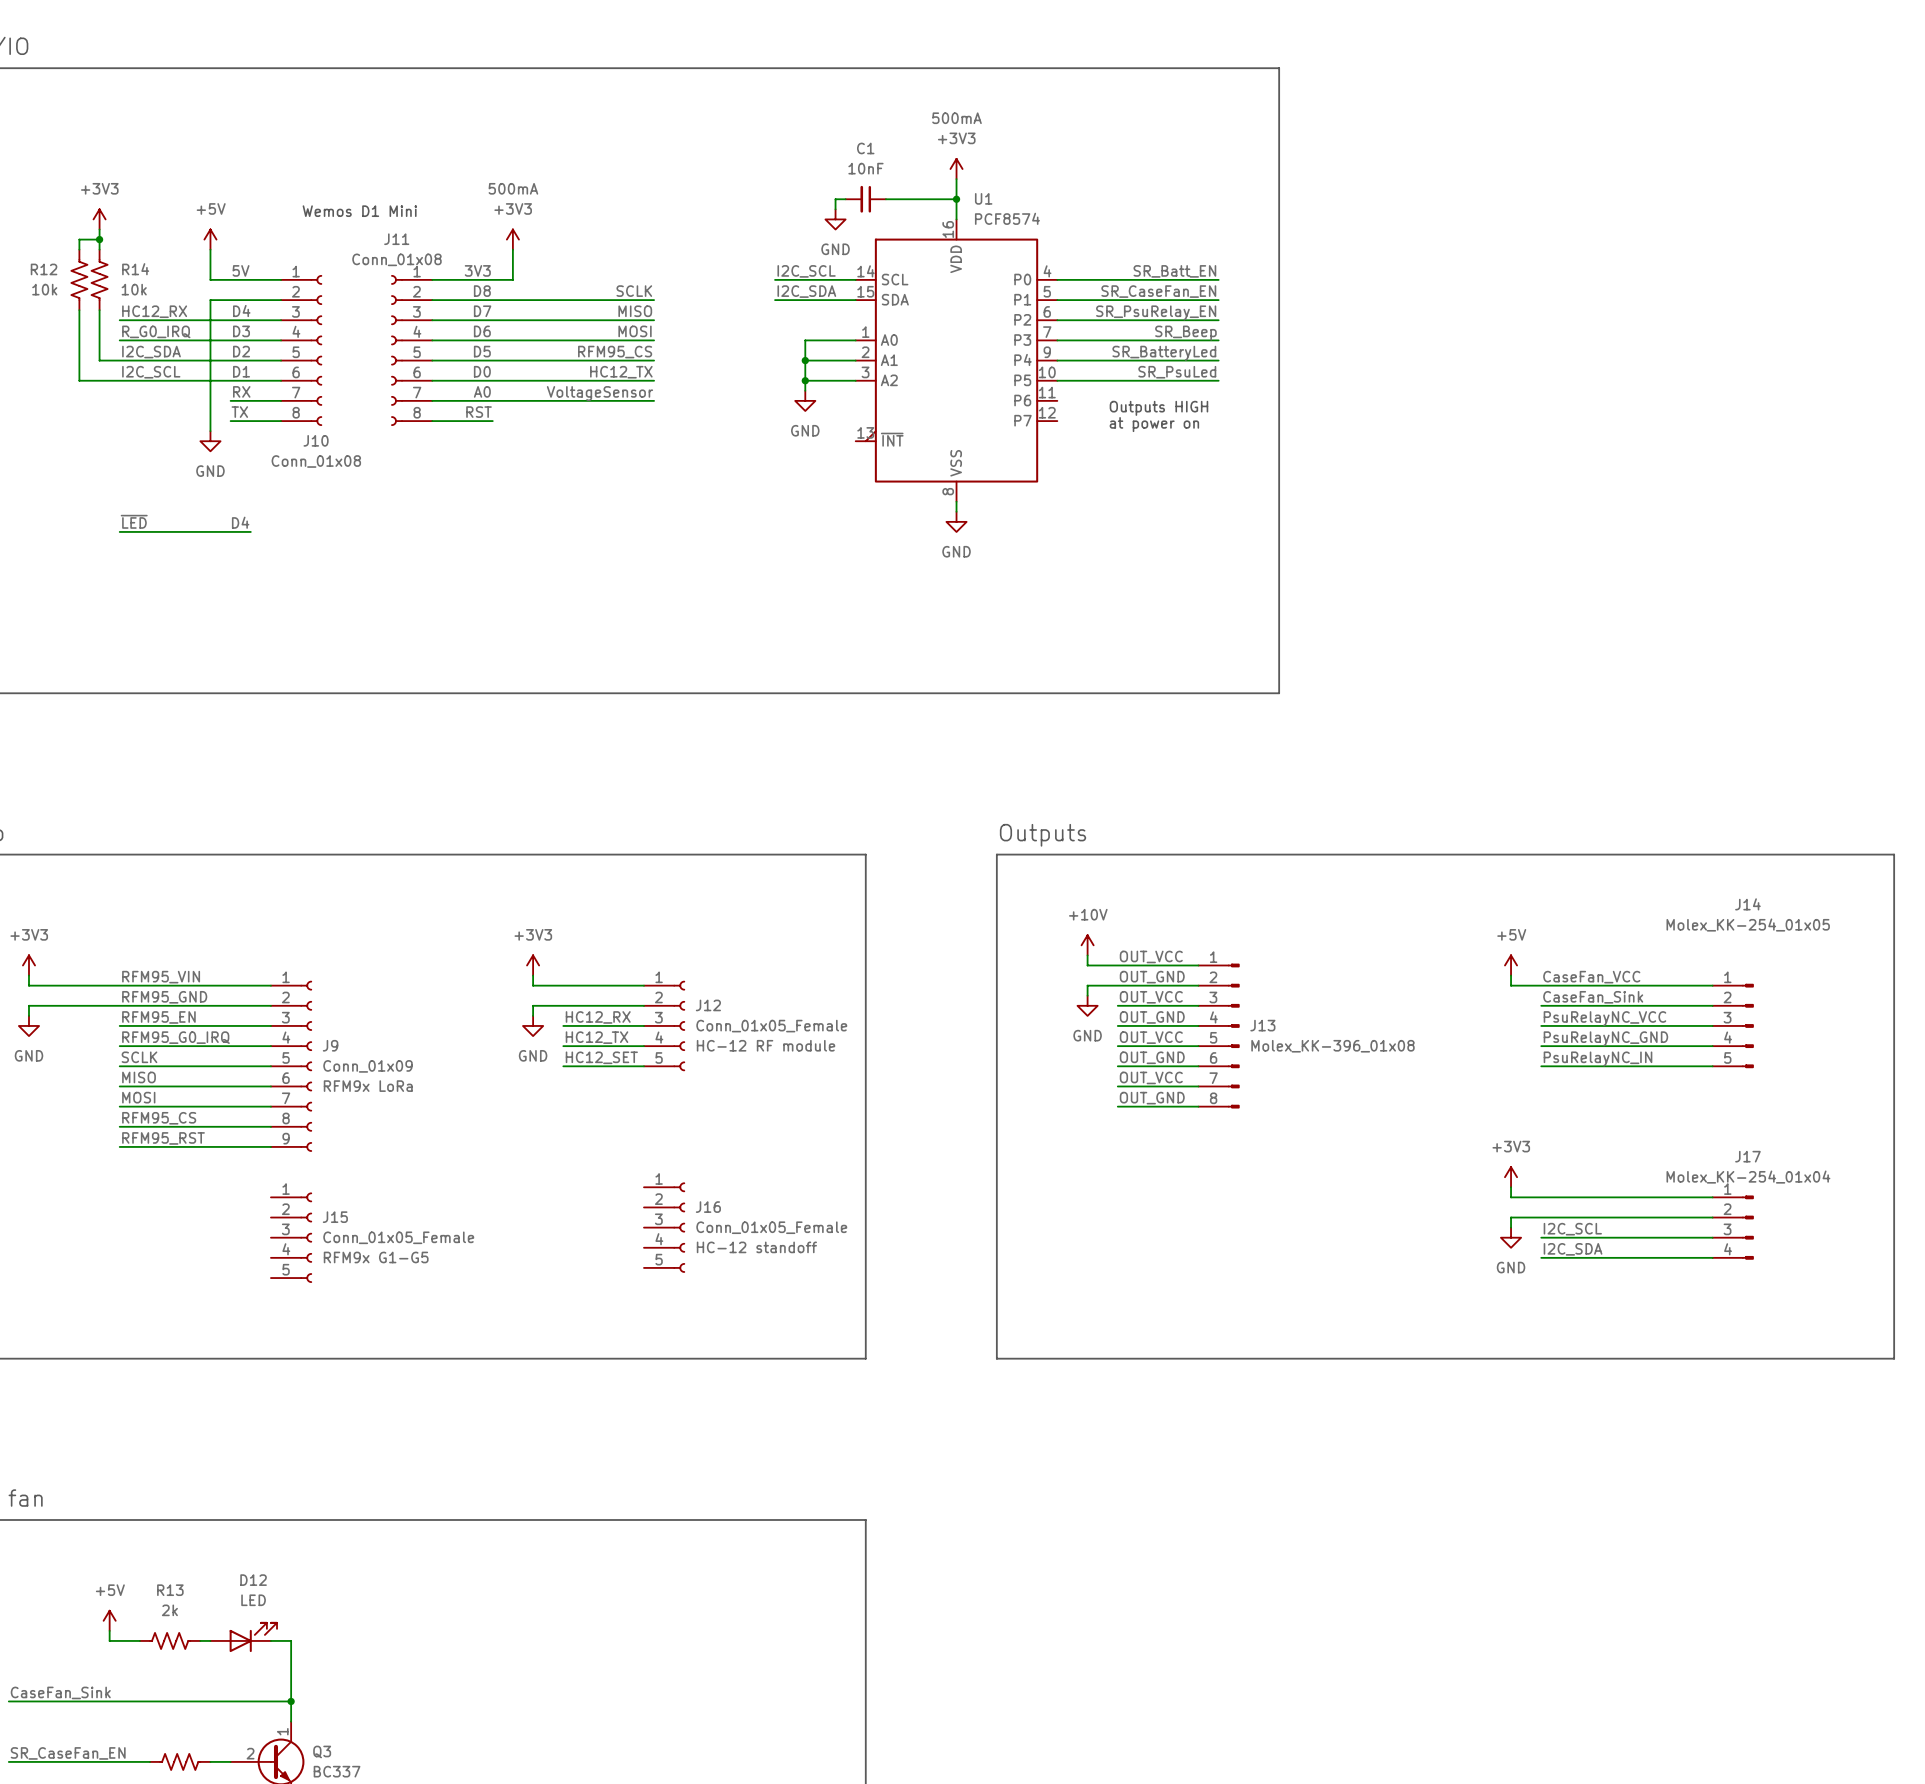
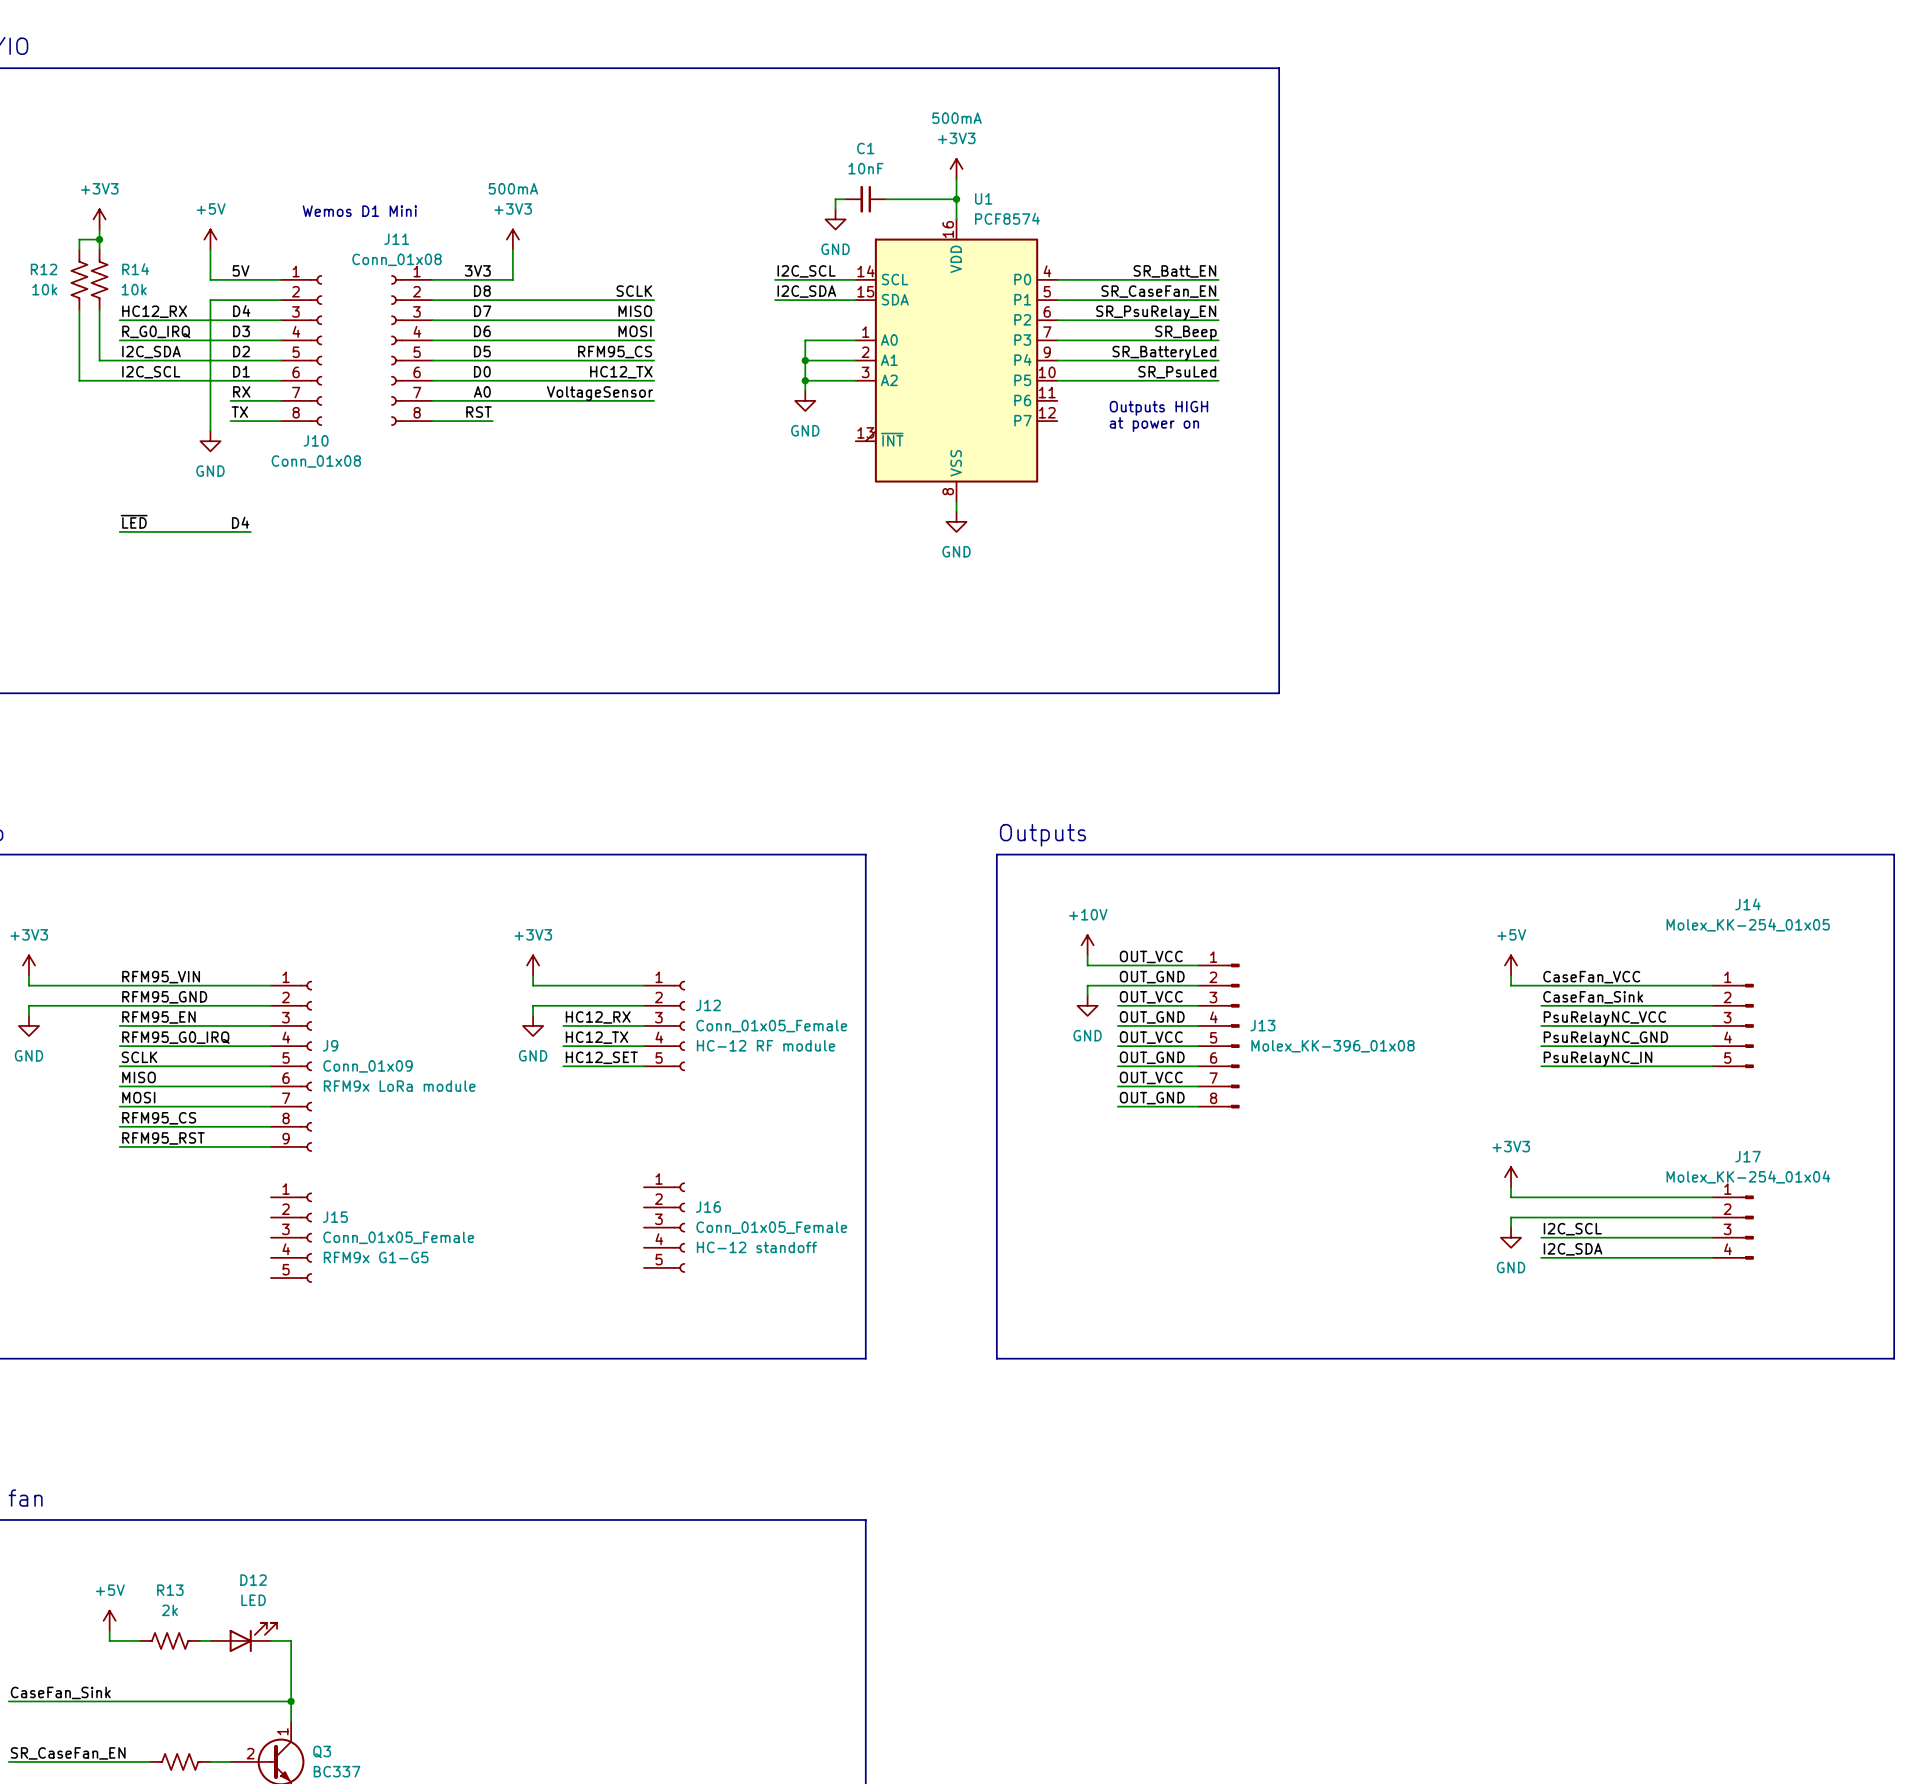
J9 text: RFM9x LoRa (368, 1086) -> RFM9x LoRa module (399, 1086)

